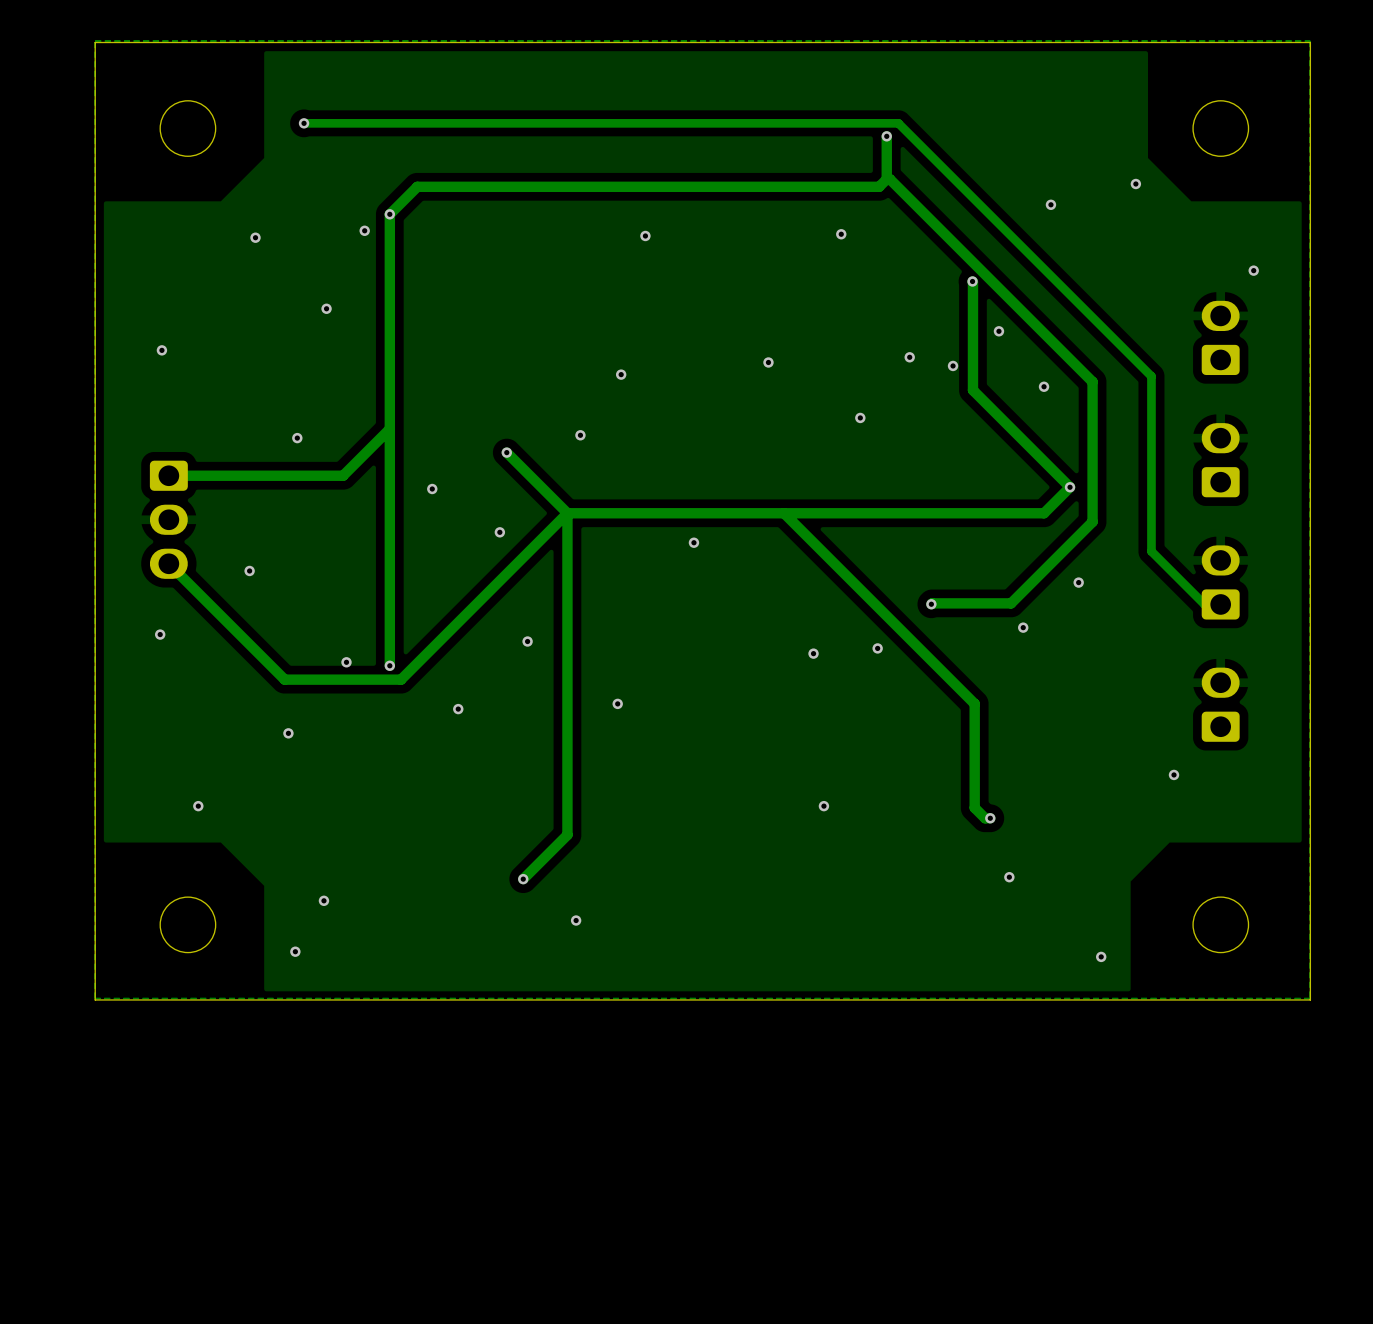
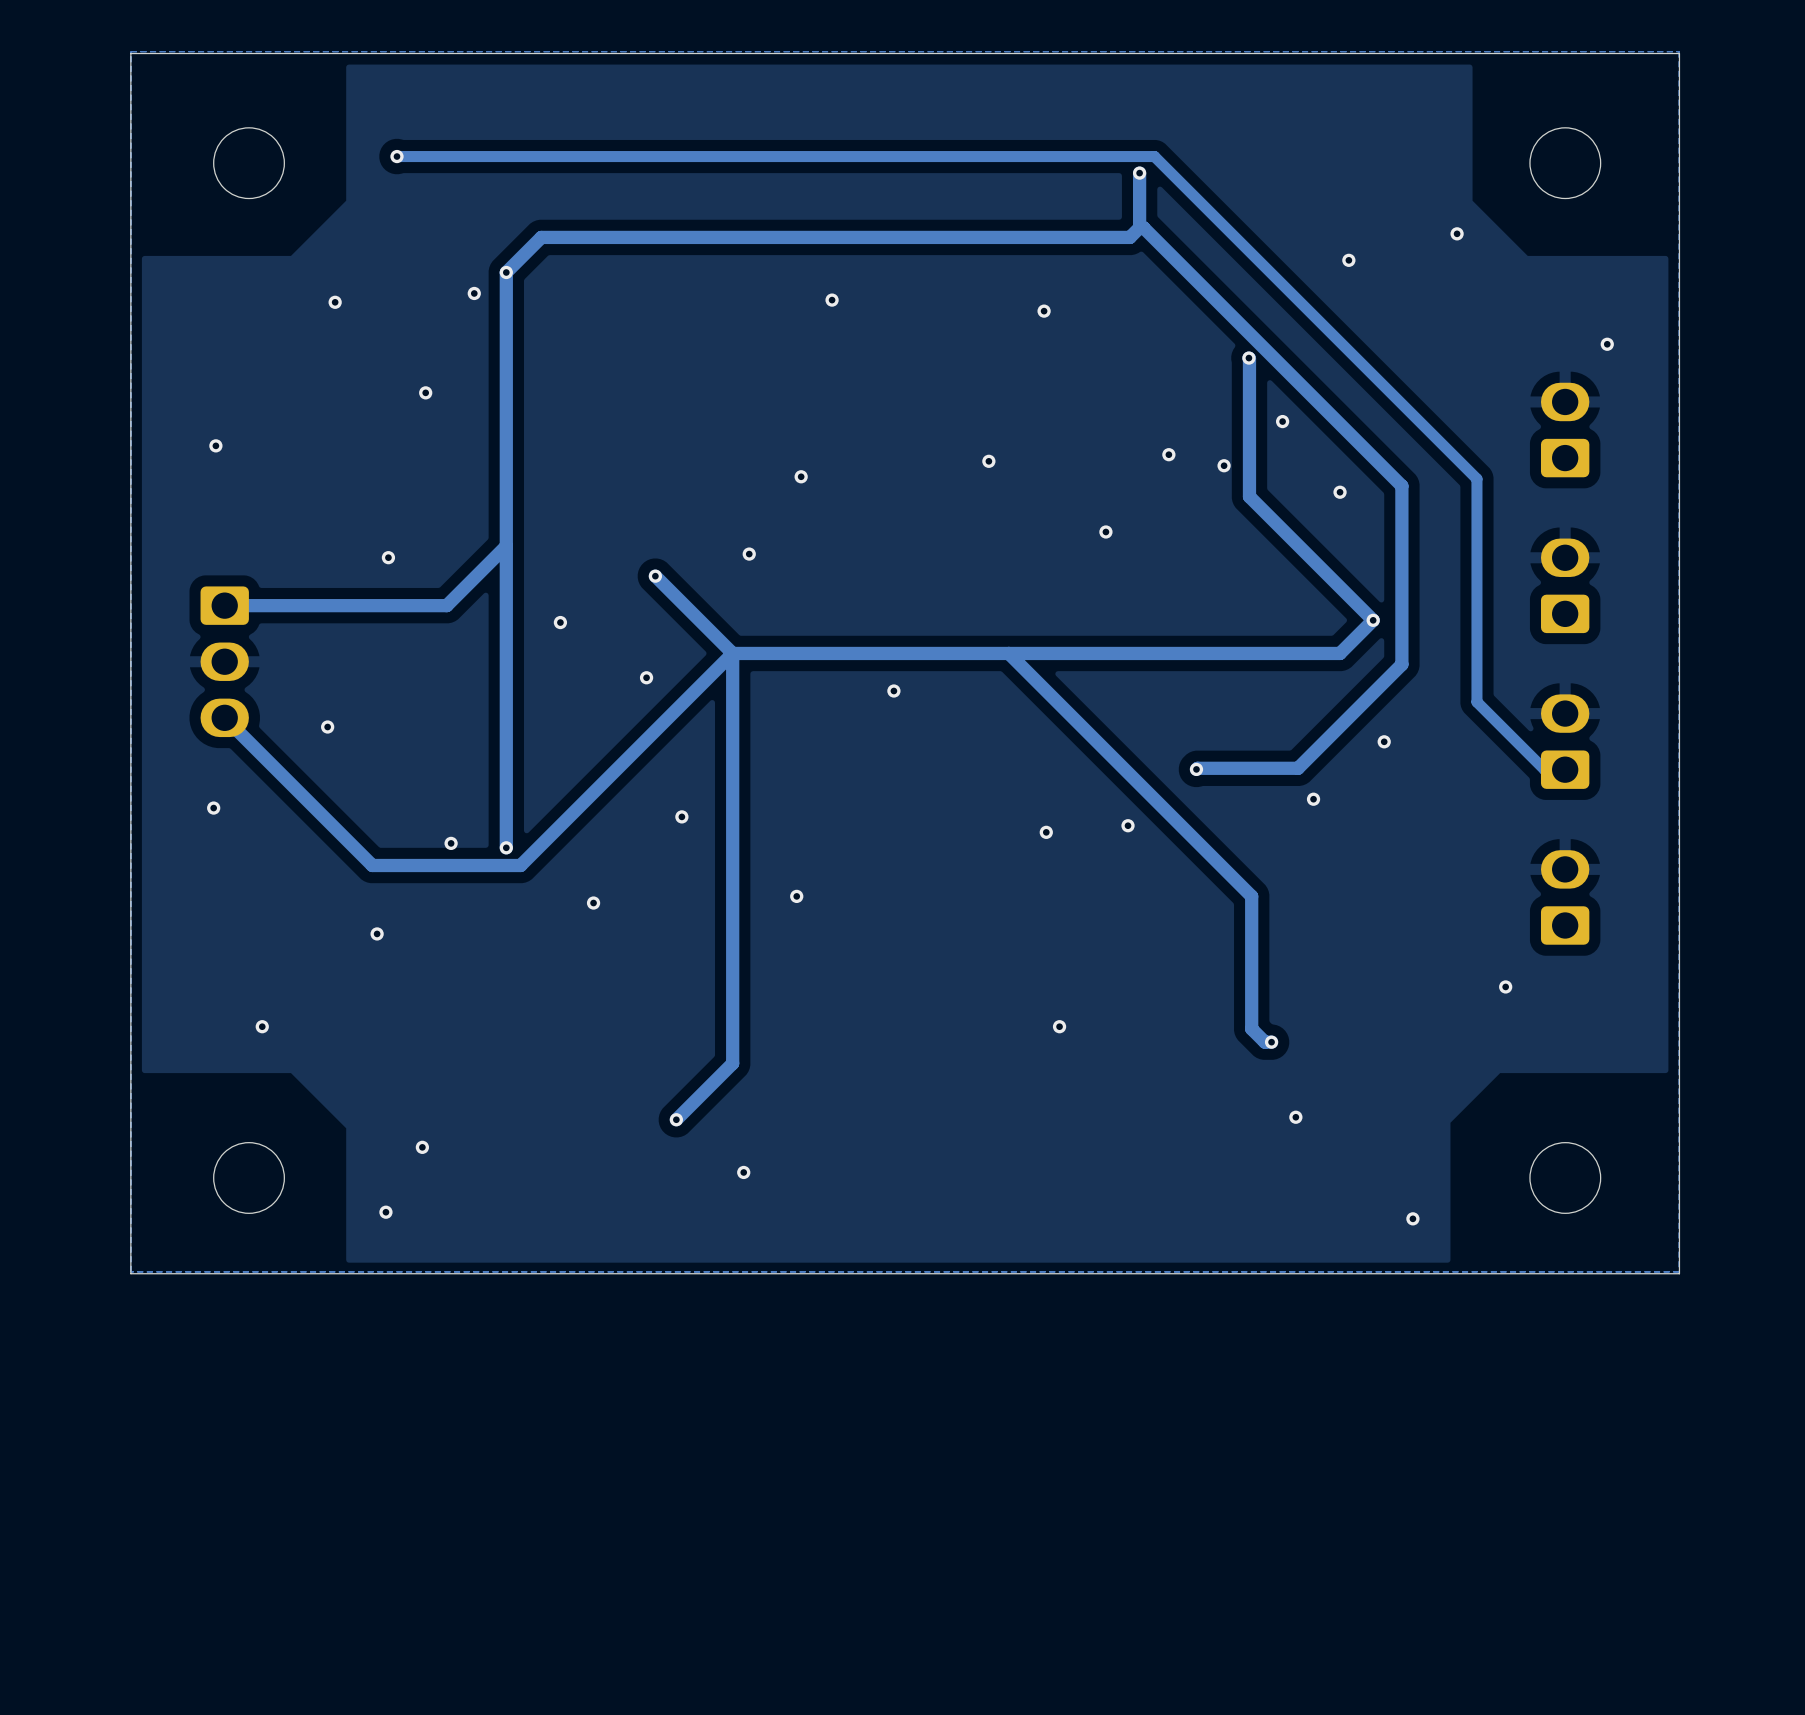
via position: (841, 234) -> (1044, 311)

